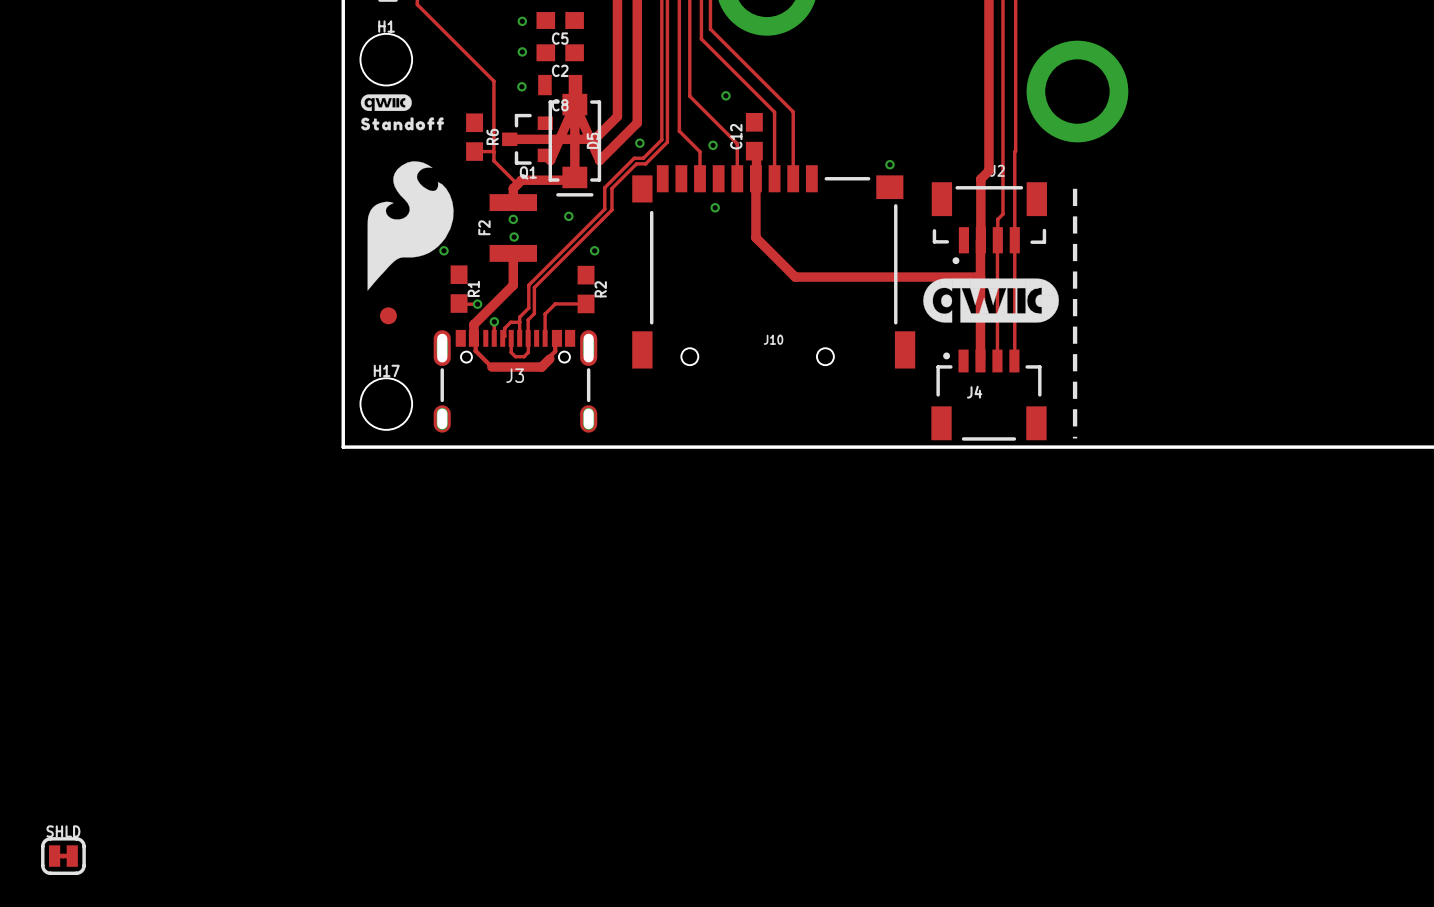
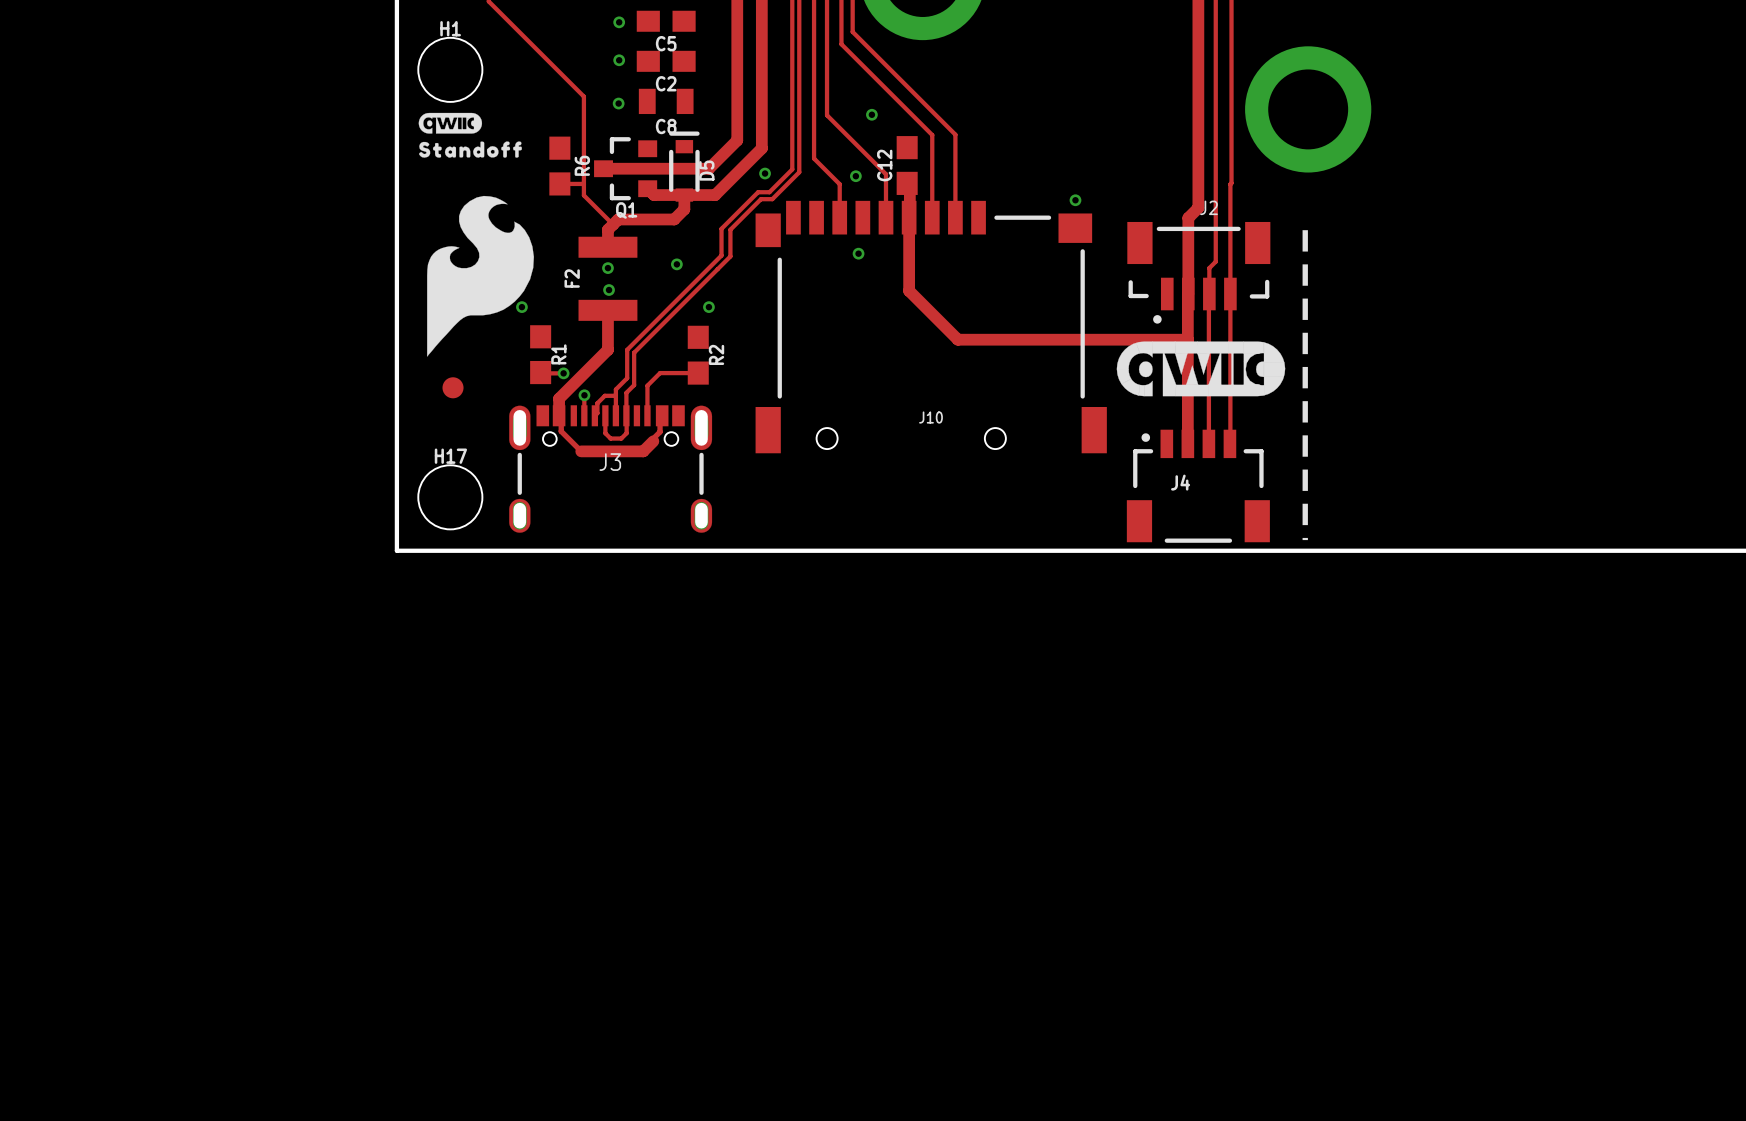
D5 footprint: [548, 93, 602, 197] -> [669, 131, 700, 202]
track: (574, 104) (599, 160) -> (654, 195) (715, 195)
track: (574, 104) (574, 160) -> none
track: (574, 104) (550, 160) -> none
SHLD: (63, 856) -> none

